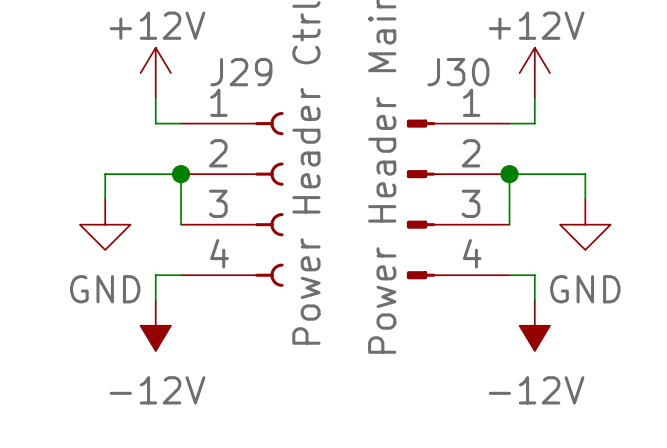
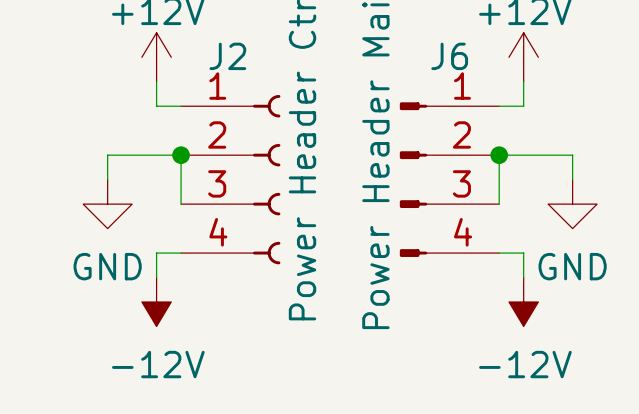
J29 name: J29 (241, 72) -> J2 (227, 56)
J30 name: J30 (458, 72) -> J6 (449, 56)

